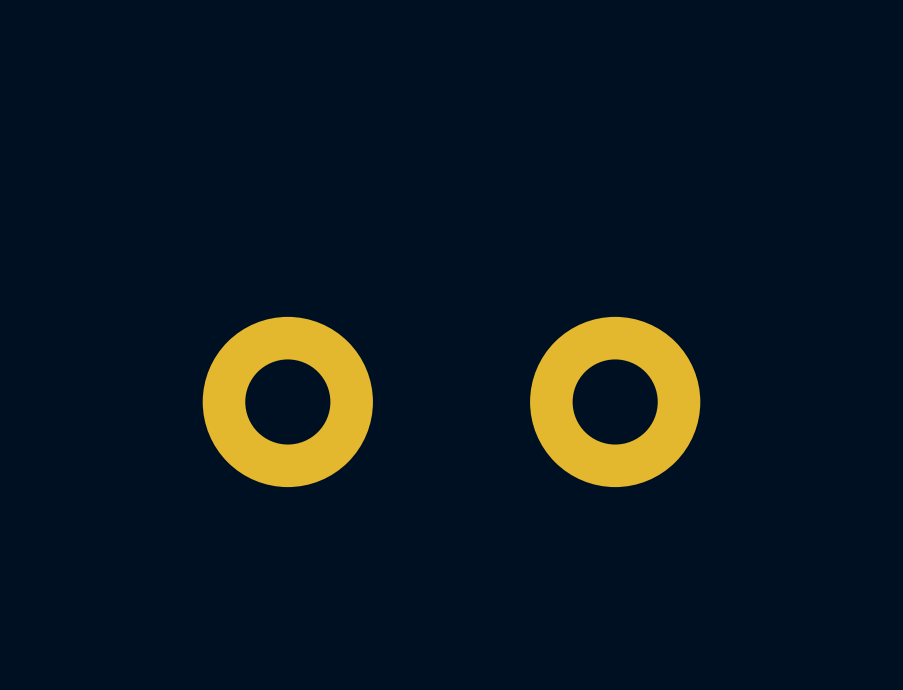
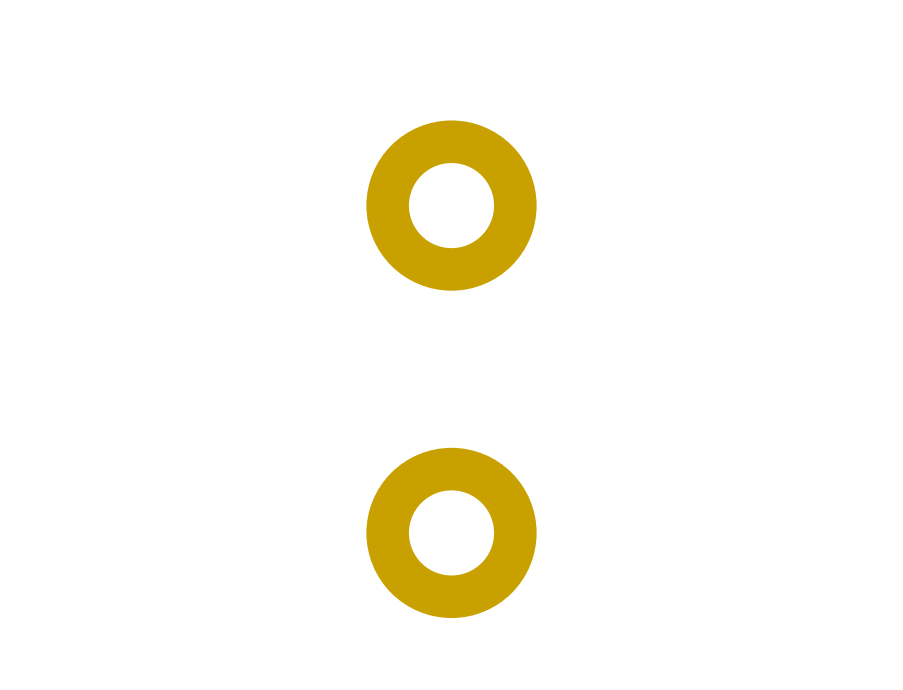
part rotation: 0° (451, 401) -> 90° clockwise (451, 369)

